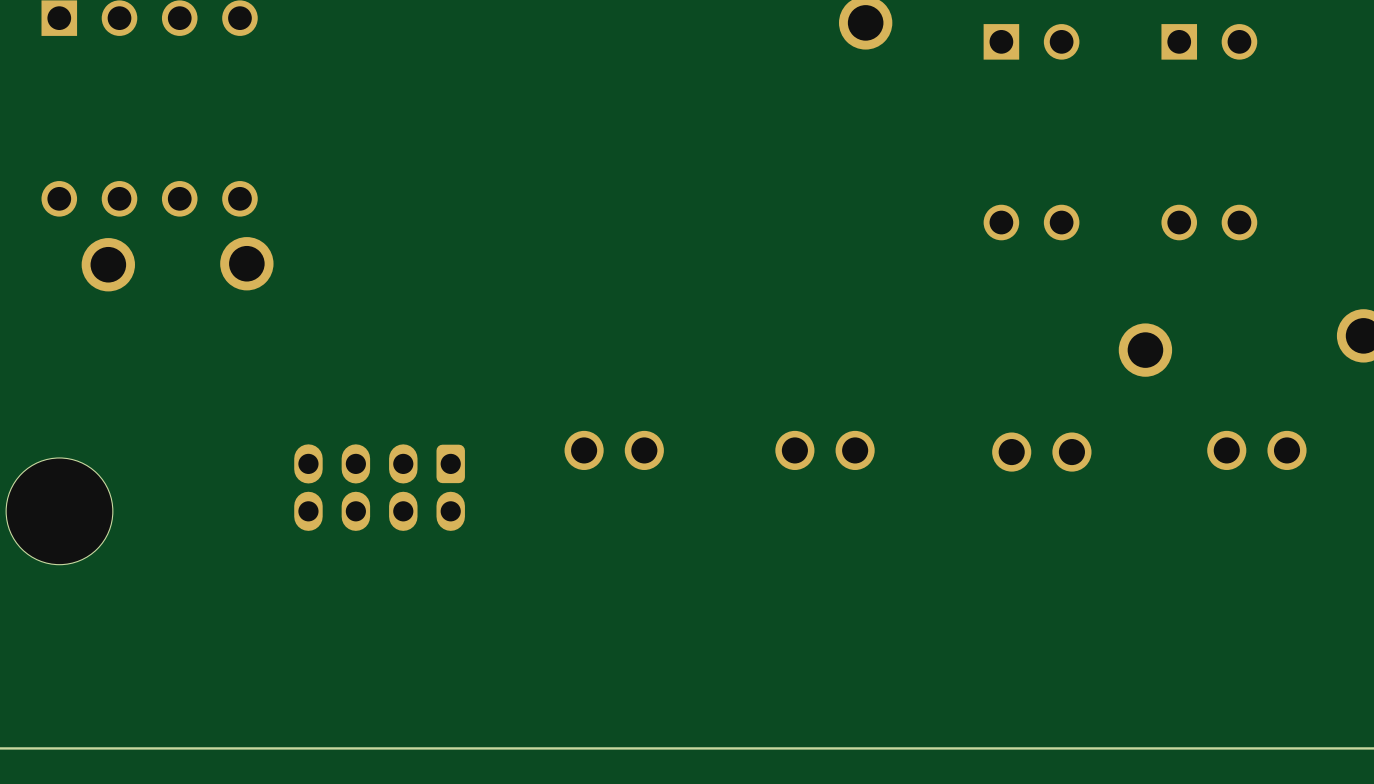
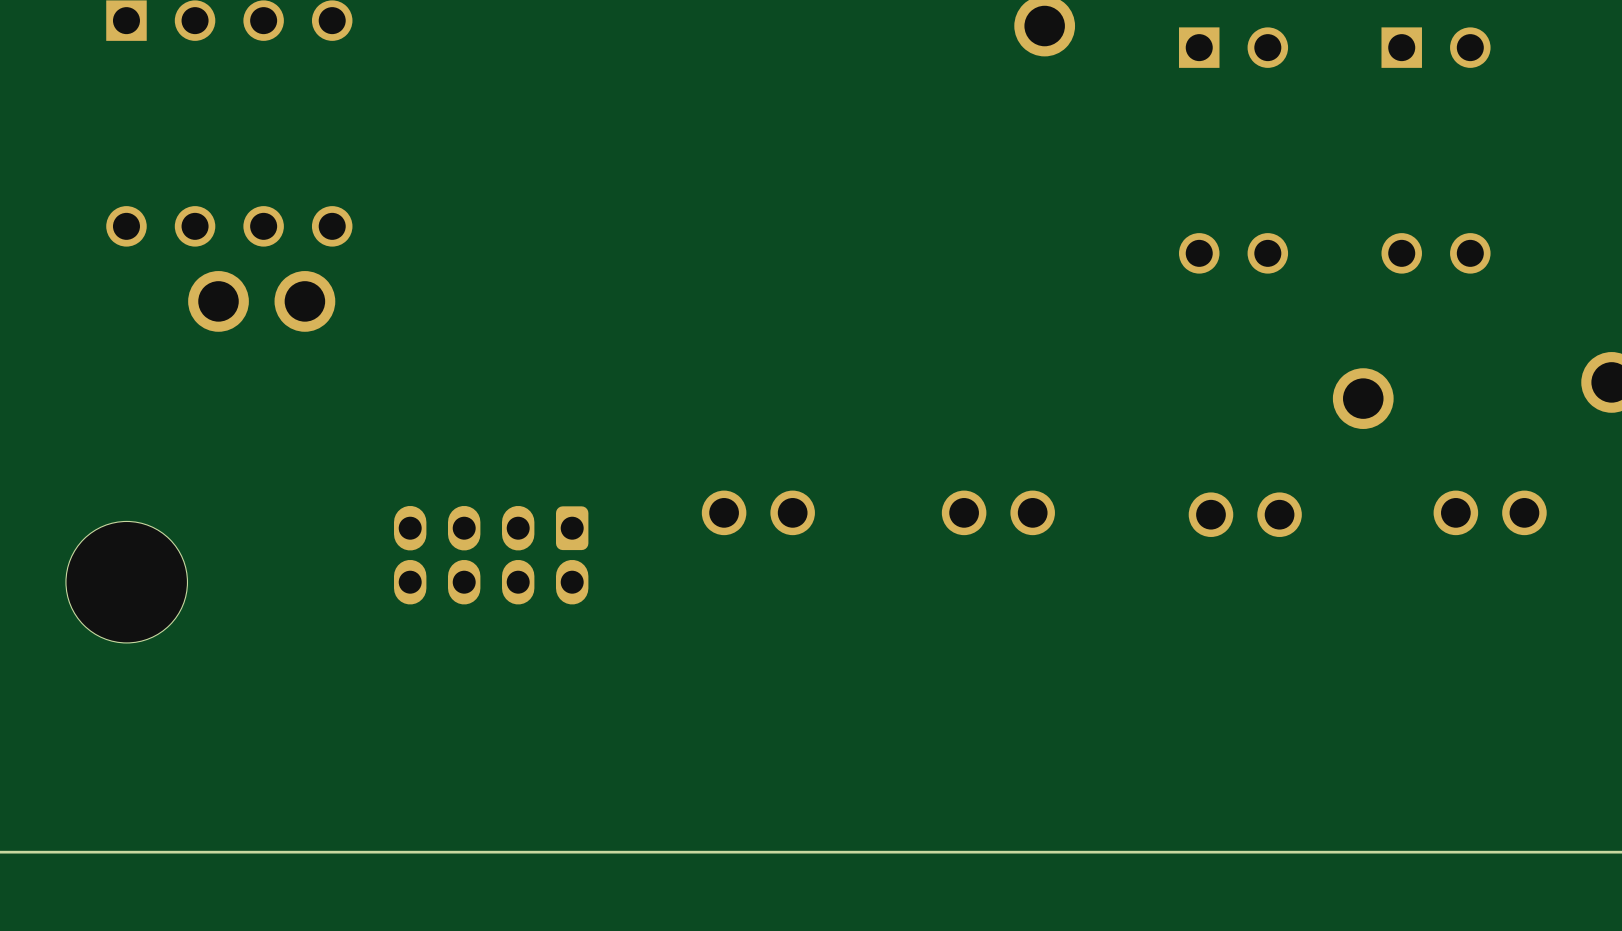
part position: (246, 263) -> (304, 301)
part position: (108, 264) -> (218, 301)

